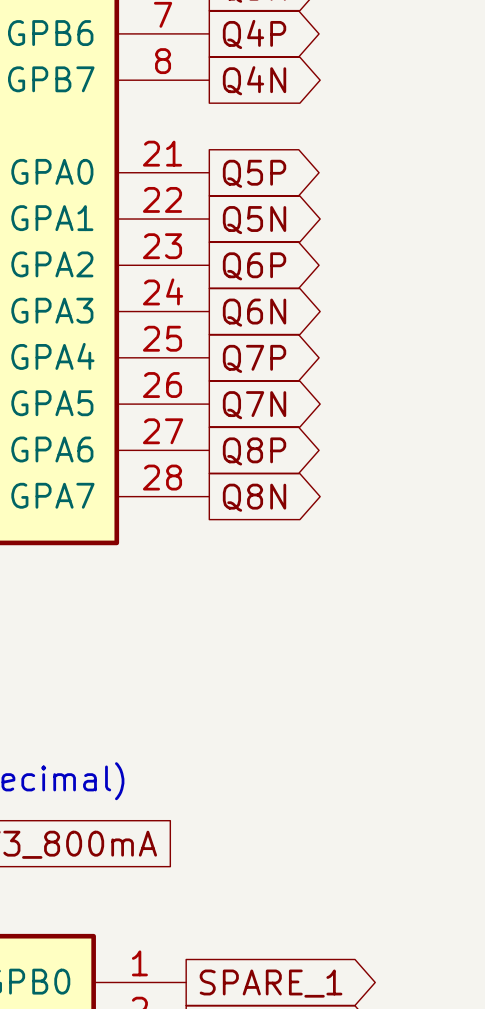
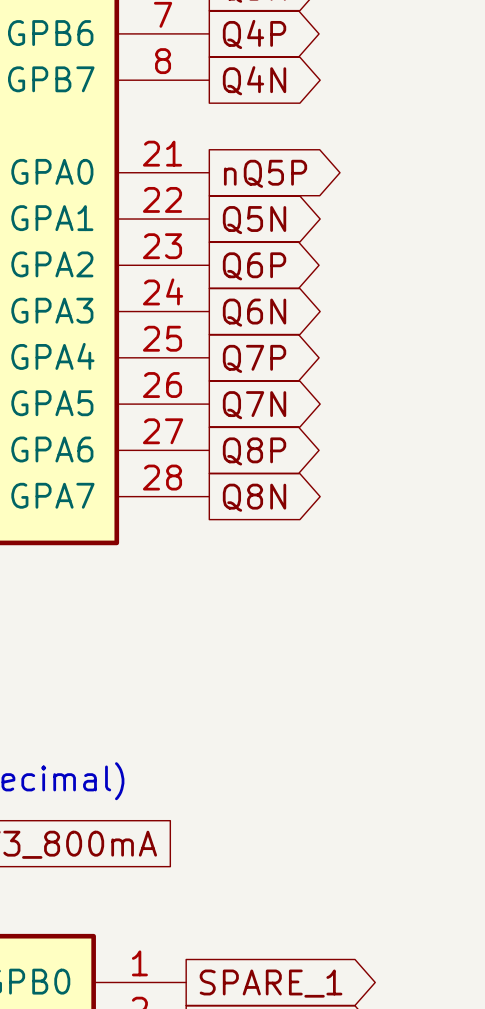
global label: Q5P (254, 173) -> nQ5P (265, 173)

